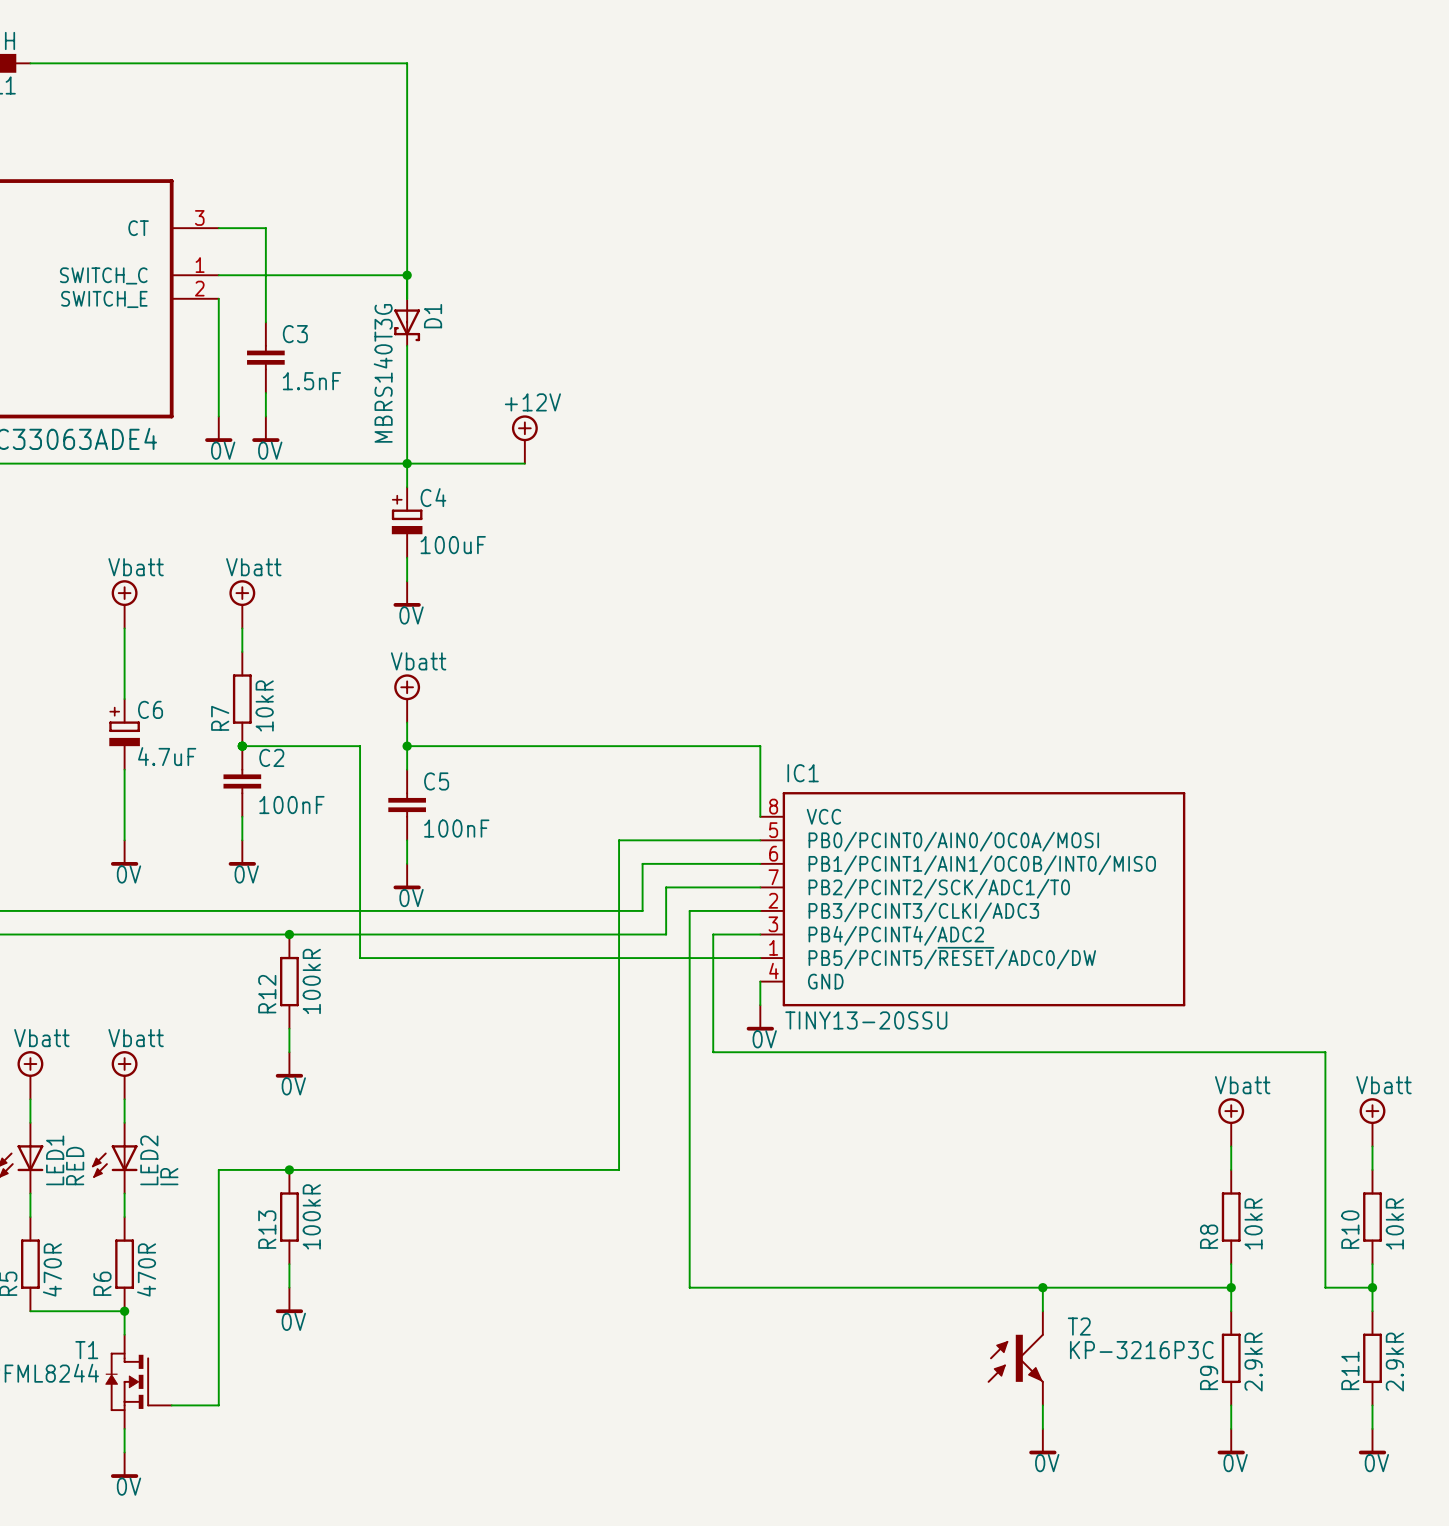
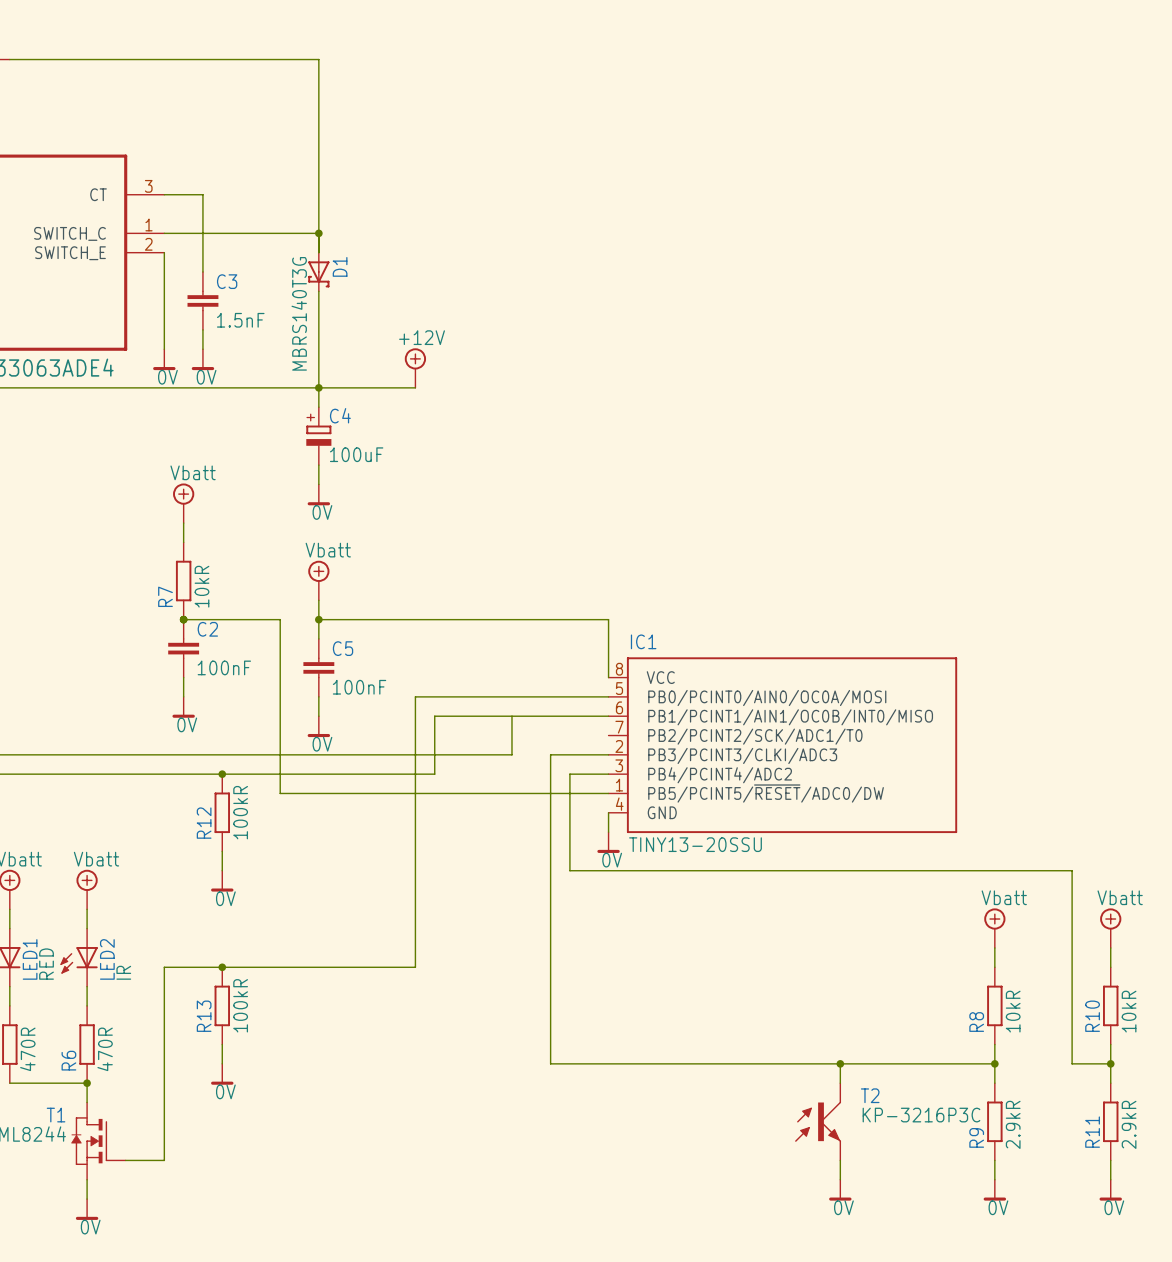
power symbol: Vbatt (124, 604) -> none
wire: (124, 628) (124, 699) -> none
C6: 4.7uF (124, 734) -> none
wire: (124, 769) (124, 840) -> none
wire: (619, 840) (619, 1169) (524, 1169) -> (492, 696) (415, 696) (415, 967)
power symbol: 0V (124, 853) -> none
wire: (760, 887) (666, 887) (666, 934) (548, 934) -> (511, 716) (434, 716) (434, 774)

